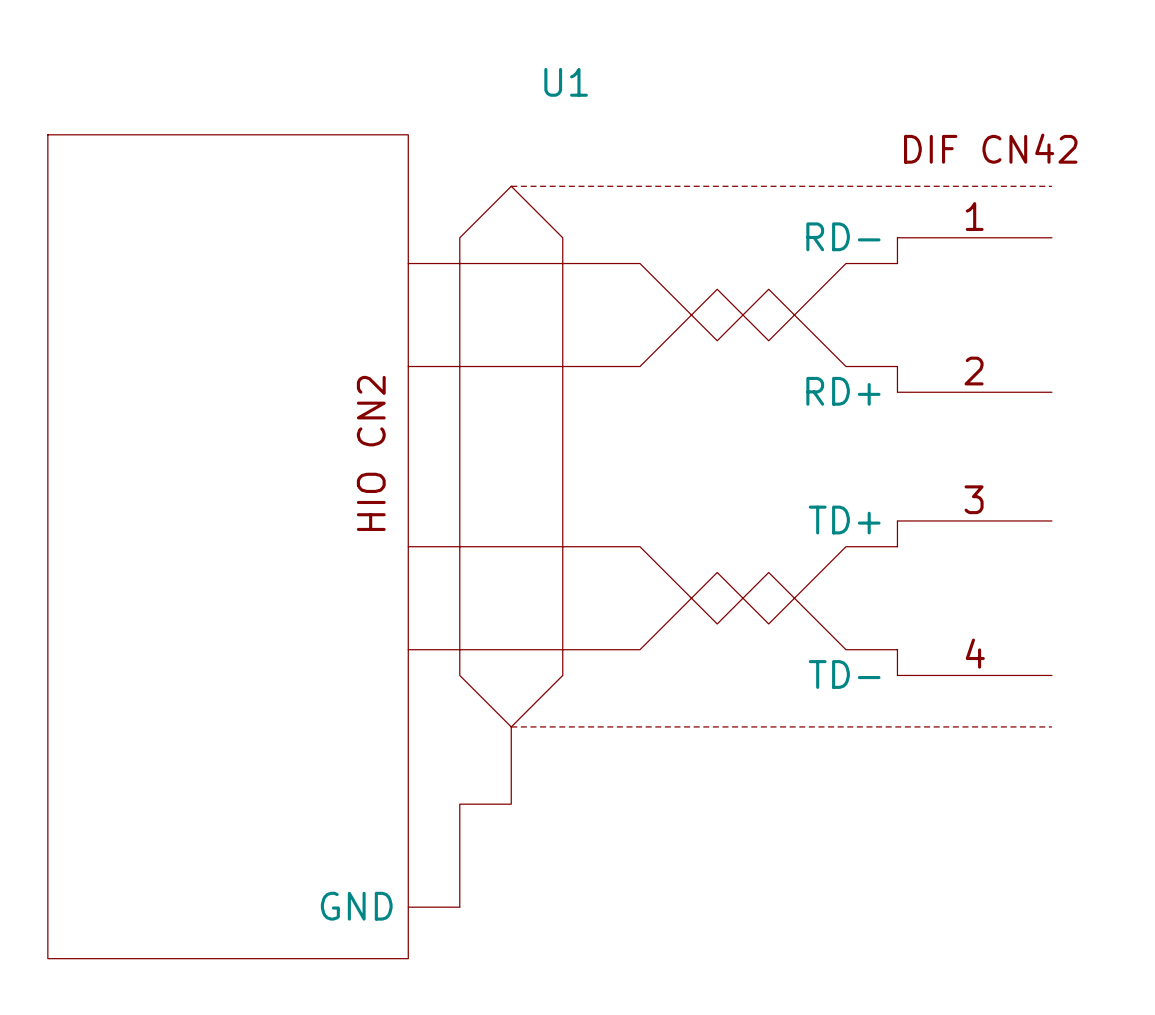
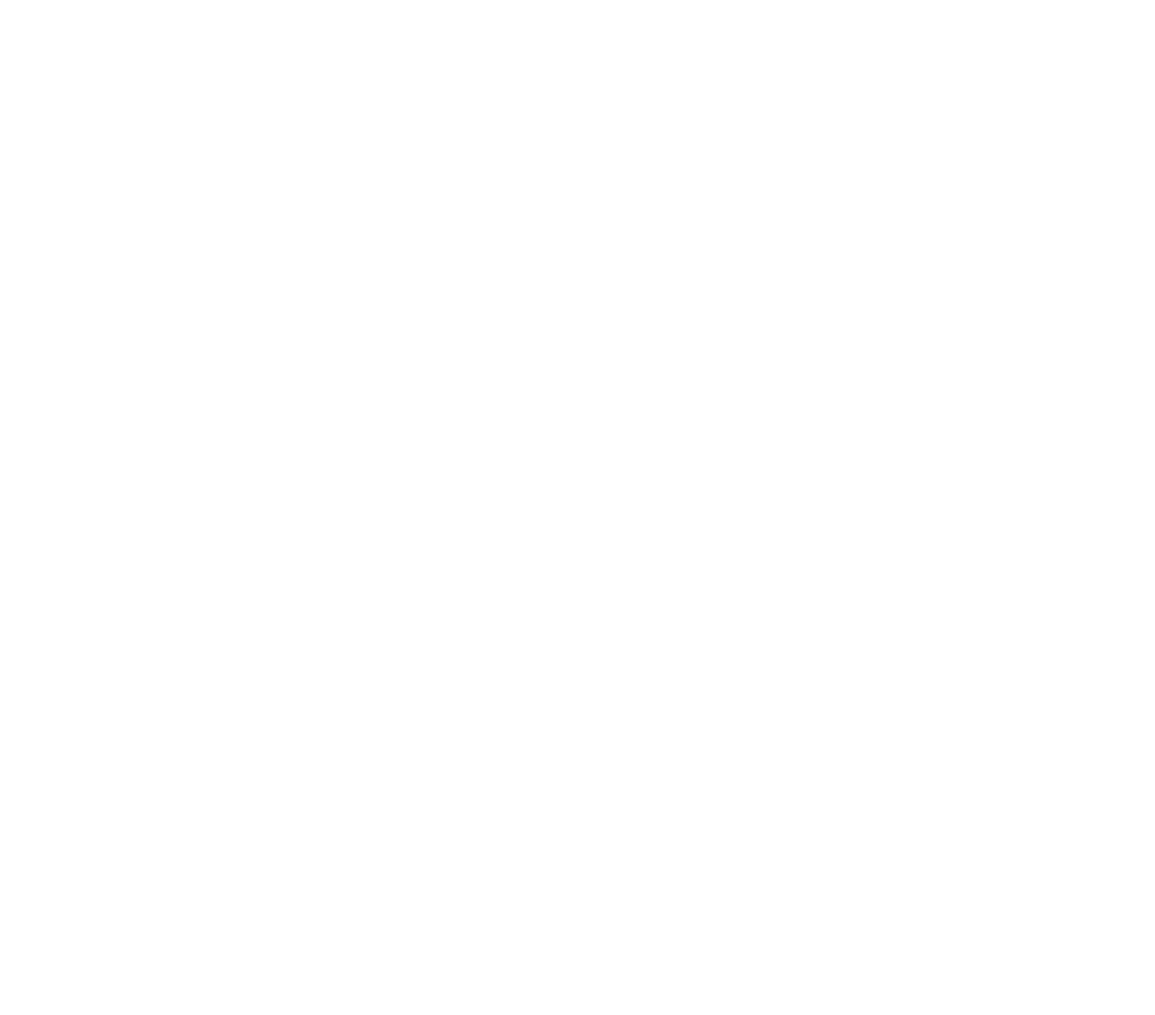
U1: (549, 546) -> none

